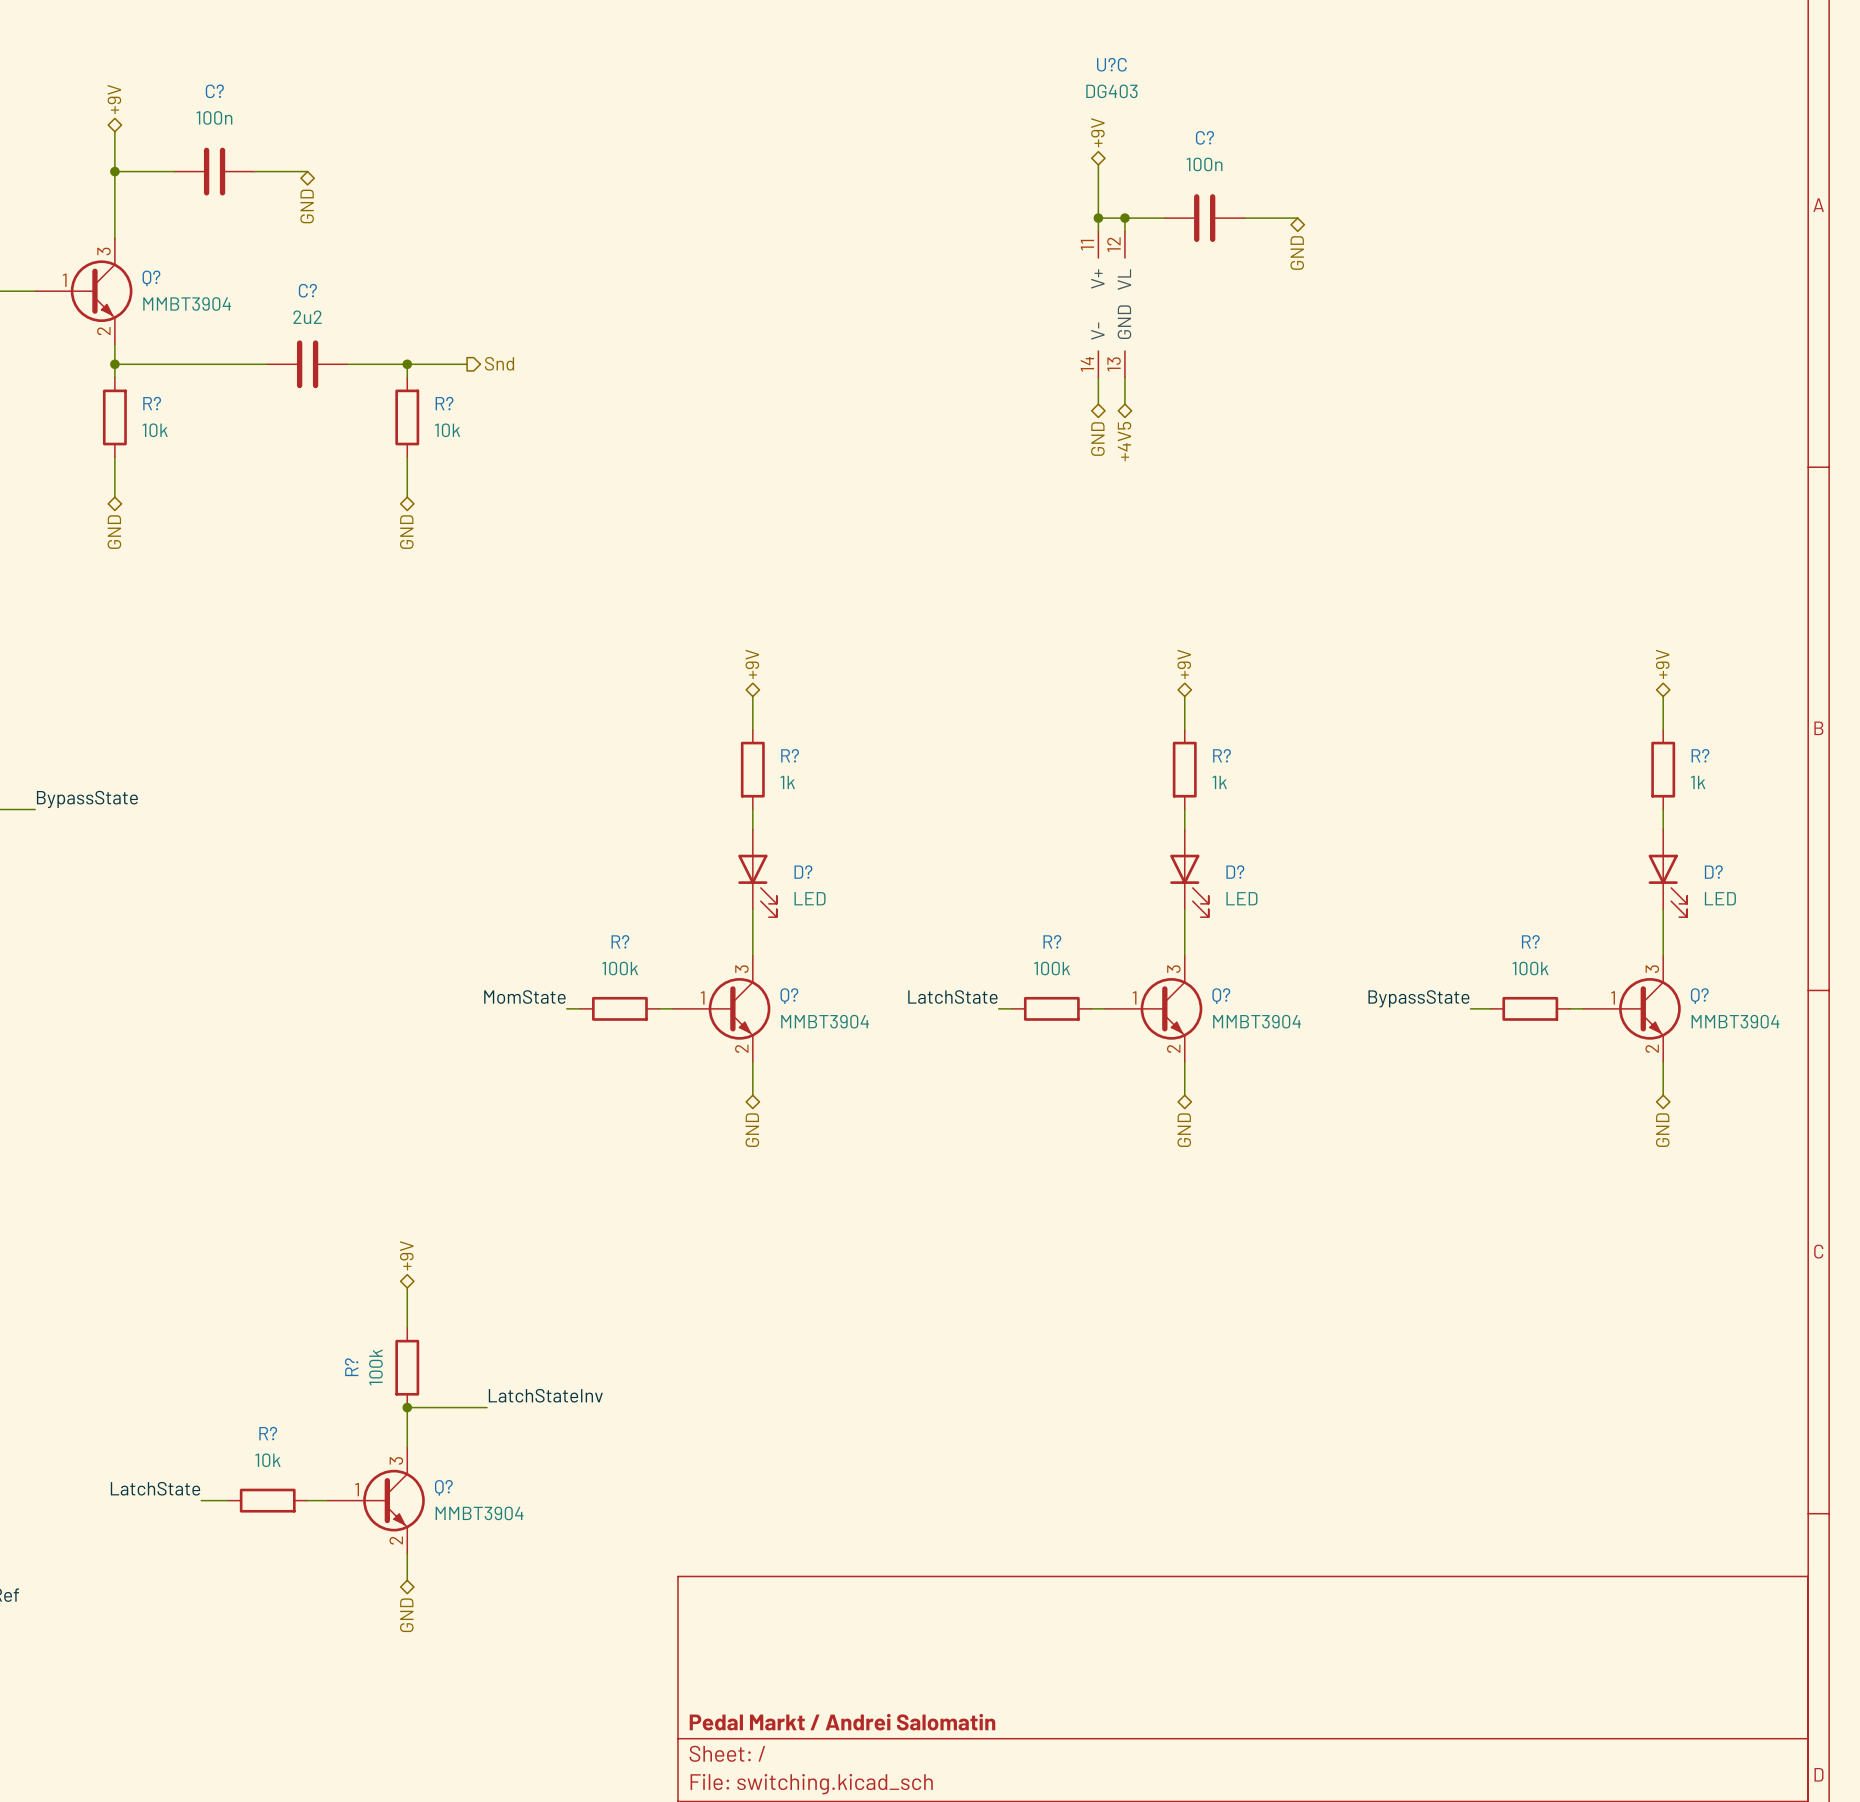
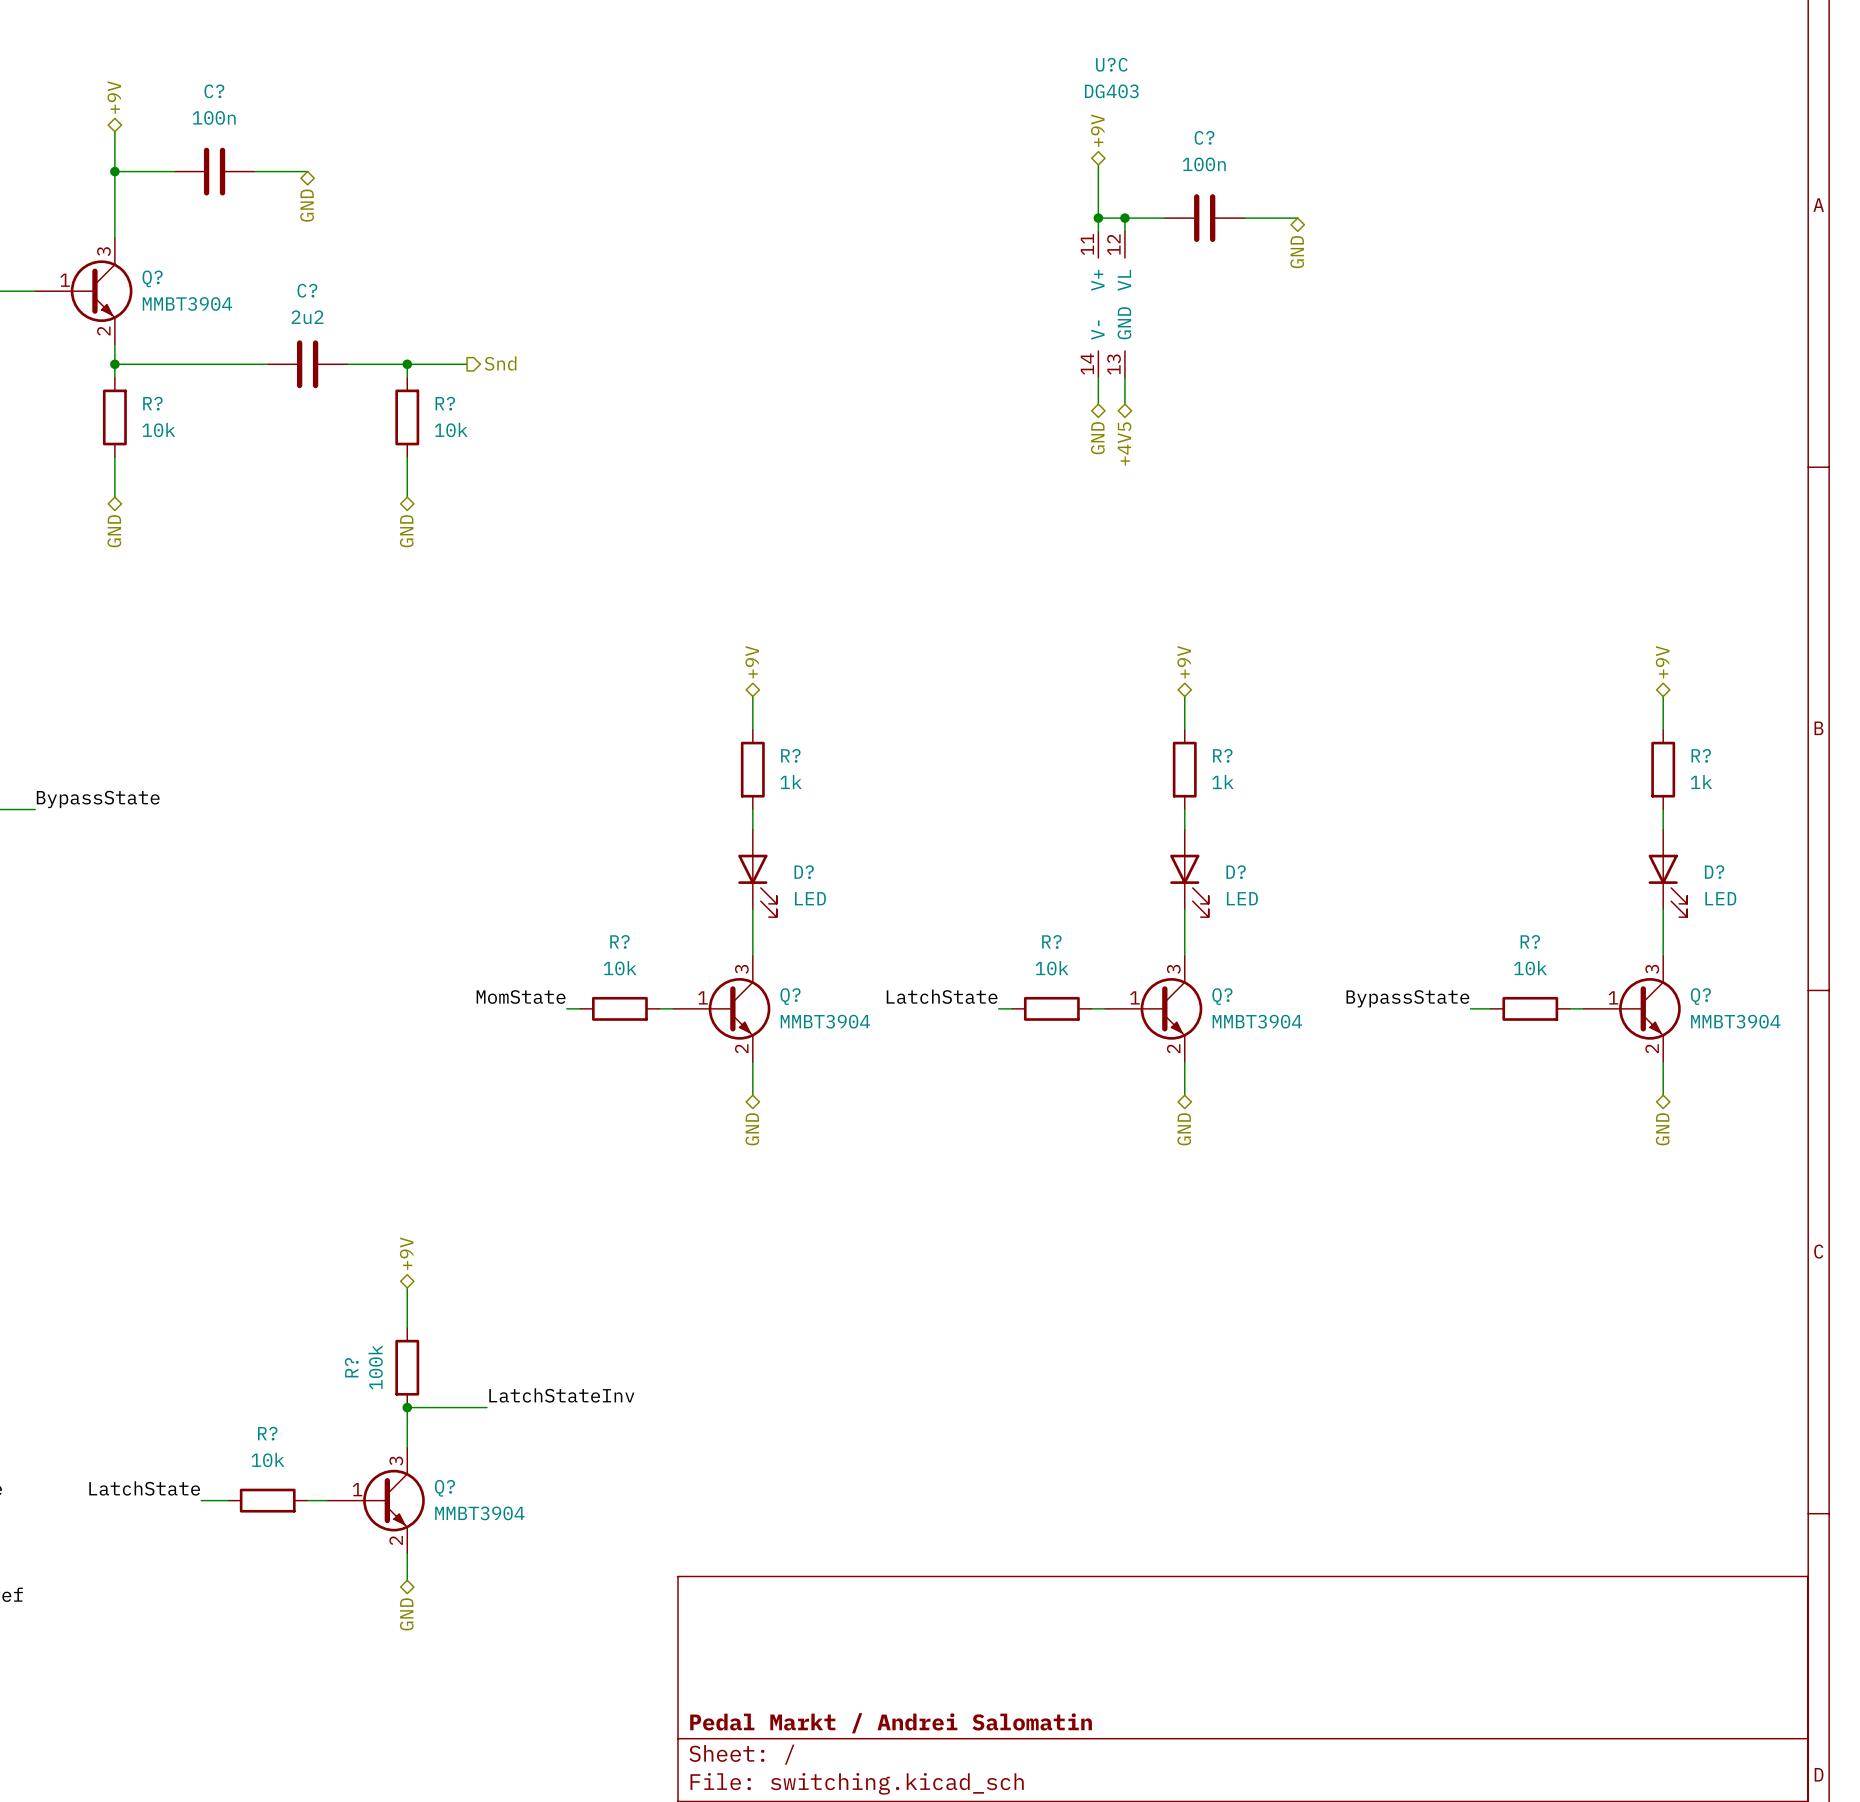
R? value: 100k (620, 968) -> 10k (620, 968)
R? value: 100k (1052, 968) -> 10k (1052, 968)
R? value: 100k (1530, 968) -> 10k (1530, 968)

